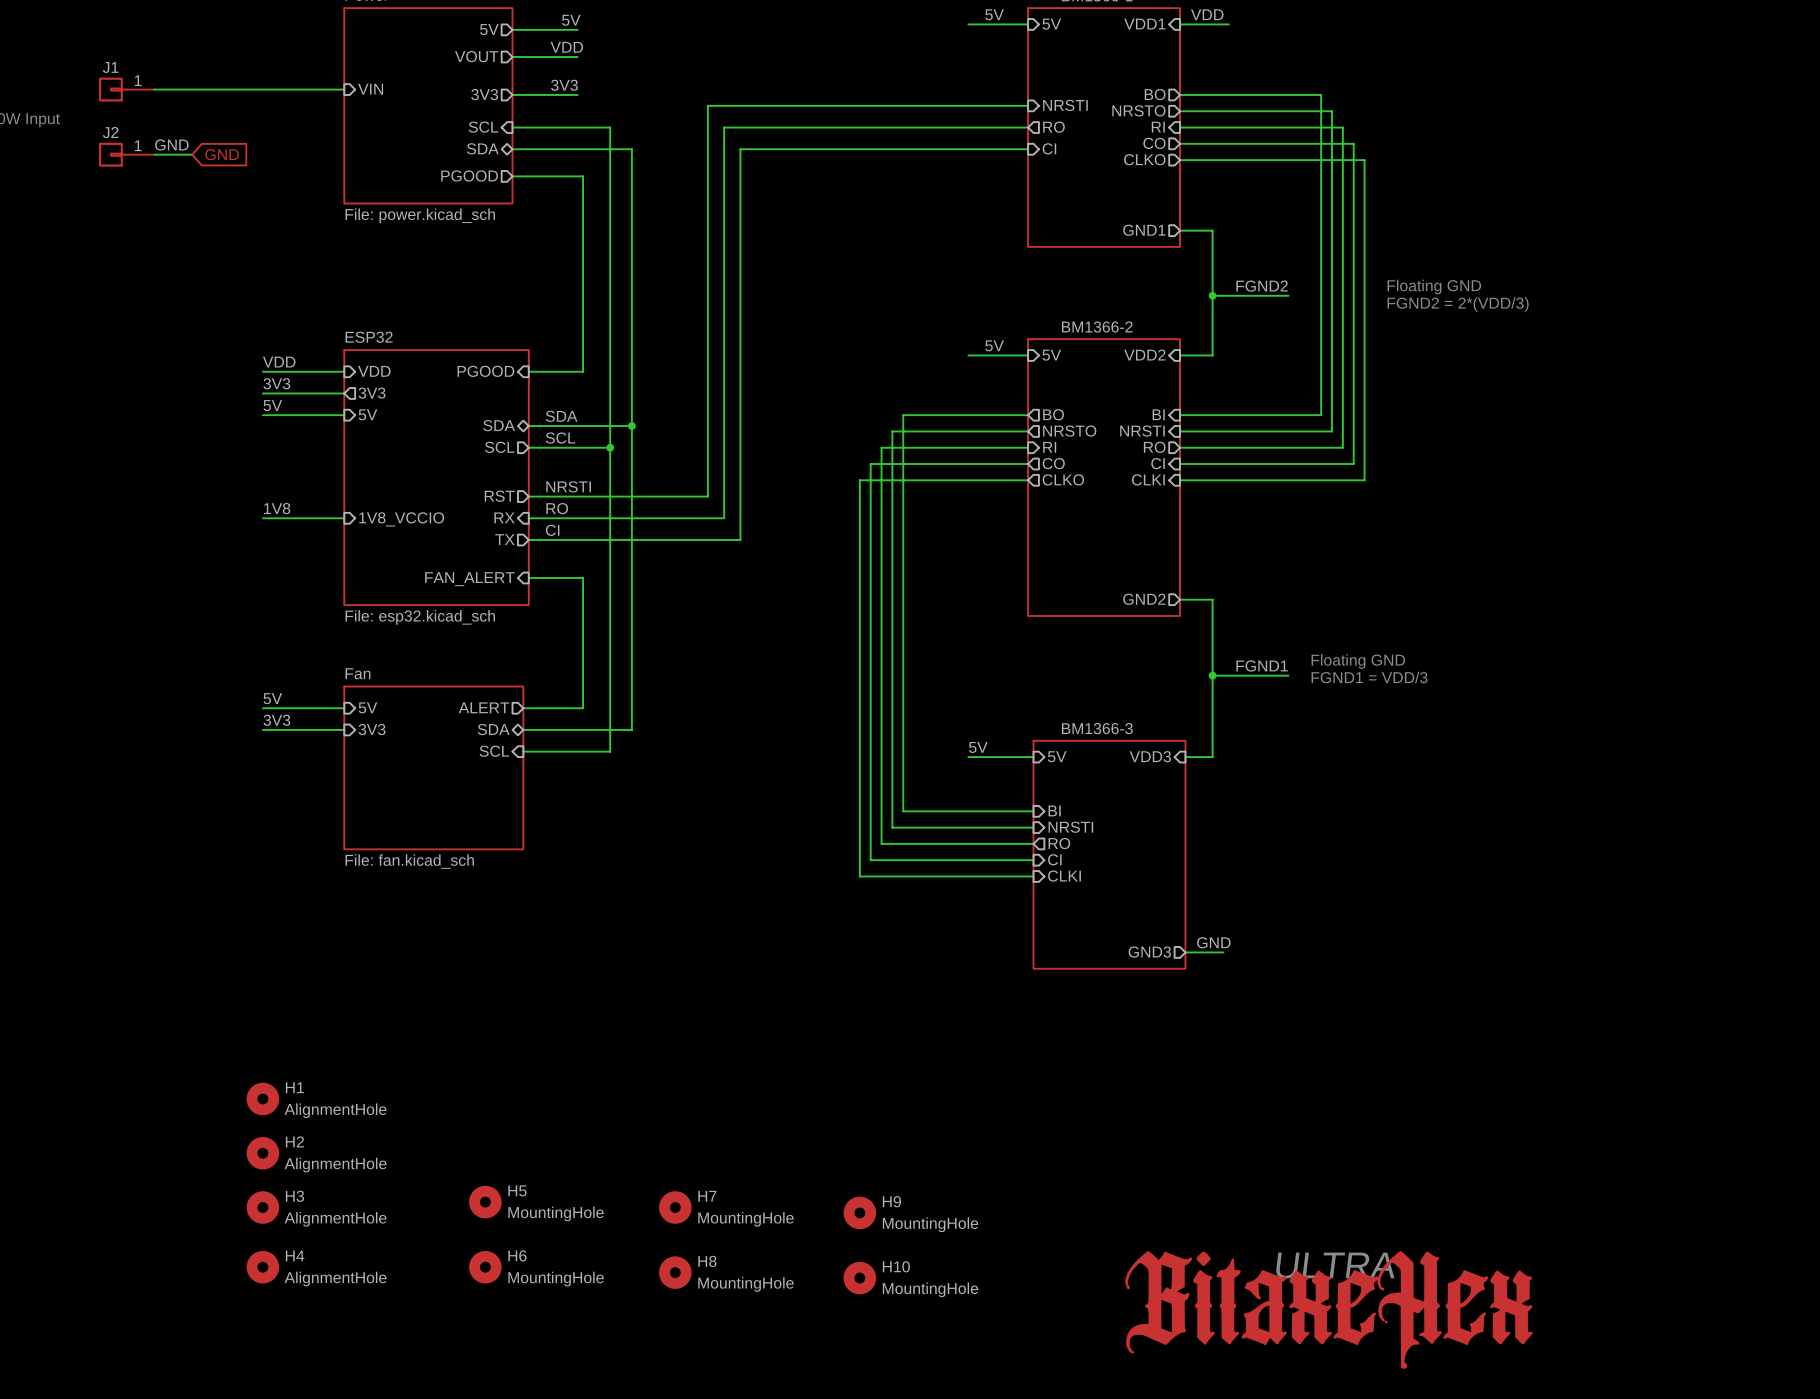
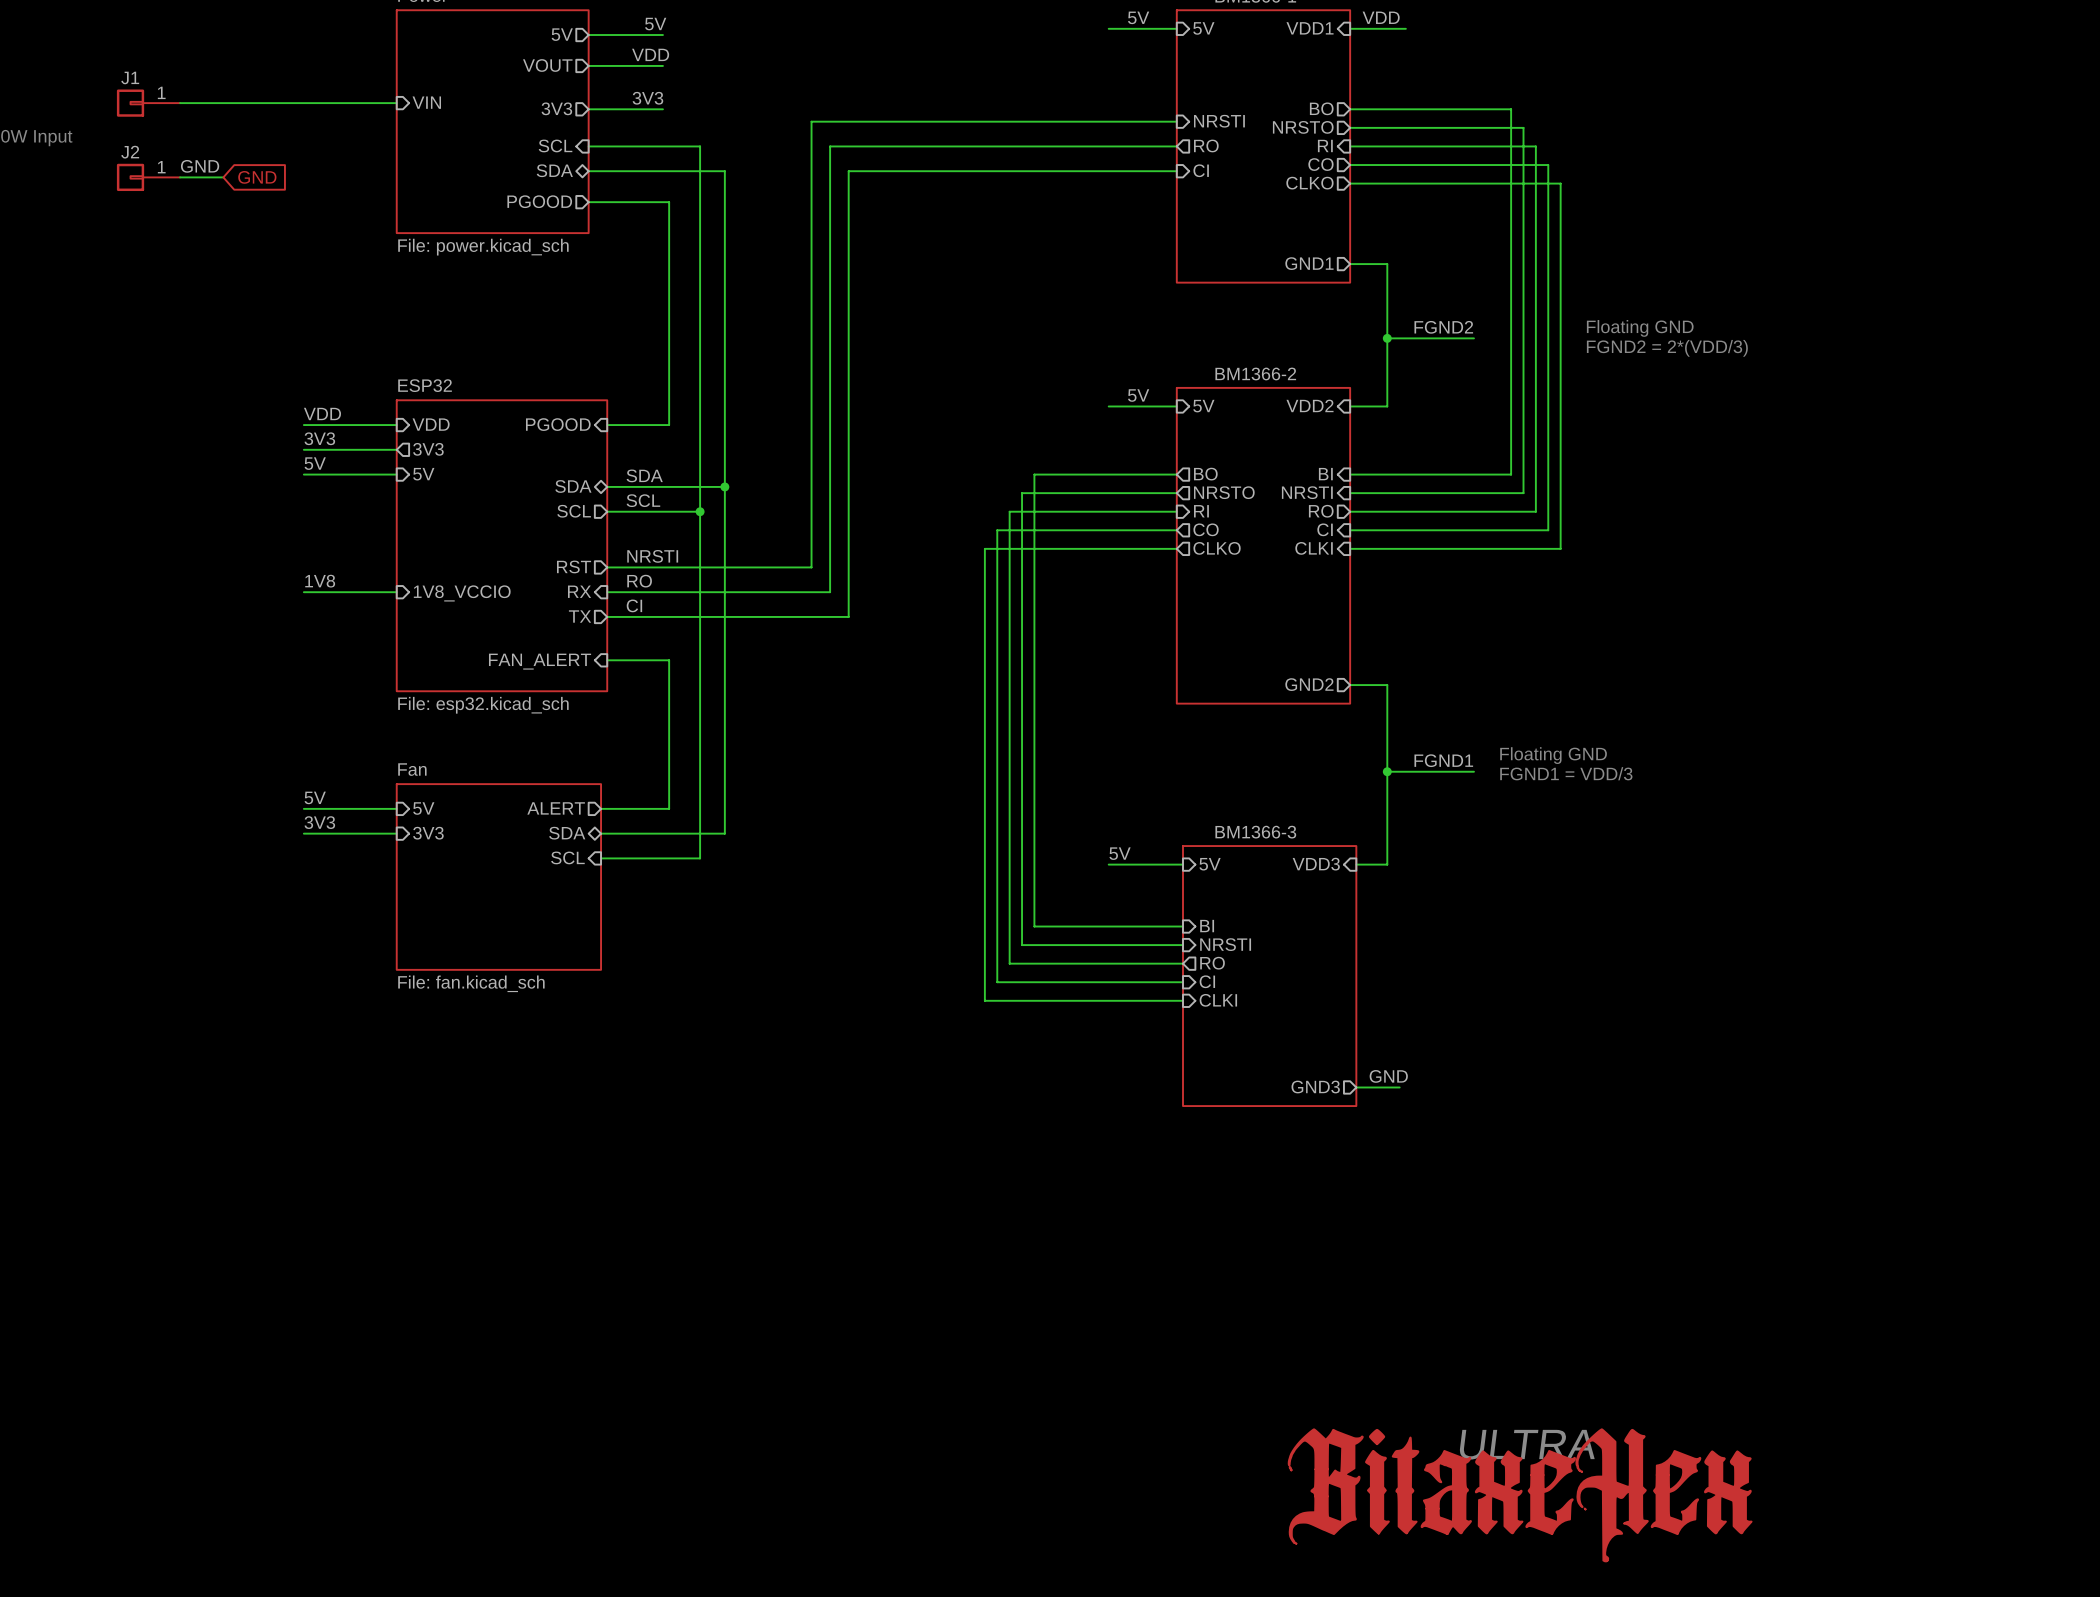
H1: AlignmentHole (262, 1098) -> none
H2: AlignmentHole (262, 1153) -> none
H5: MountingHole (485, 1202) -> none
H3: AlignmentHole (262, 1207) -> none
H7: MountingHole (675, 1207) -> none
H9: MountingHole (859, 1212) -> none
H4: AlignmentHole (262, 1267) -> none
H6: MountingHole (485, 1267) -> none
H8: MountingHole (675, 1272) -> none
H10: MountingHole (859, 1278) -> none

